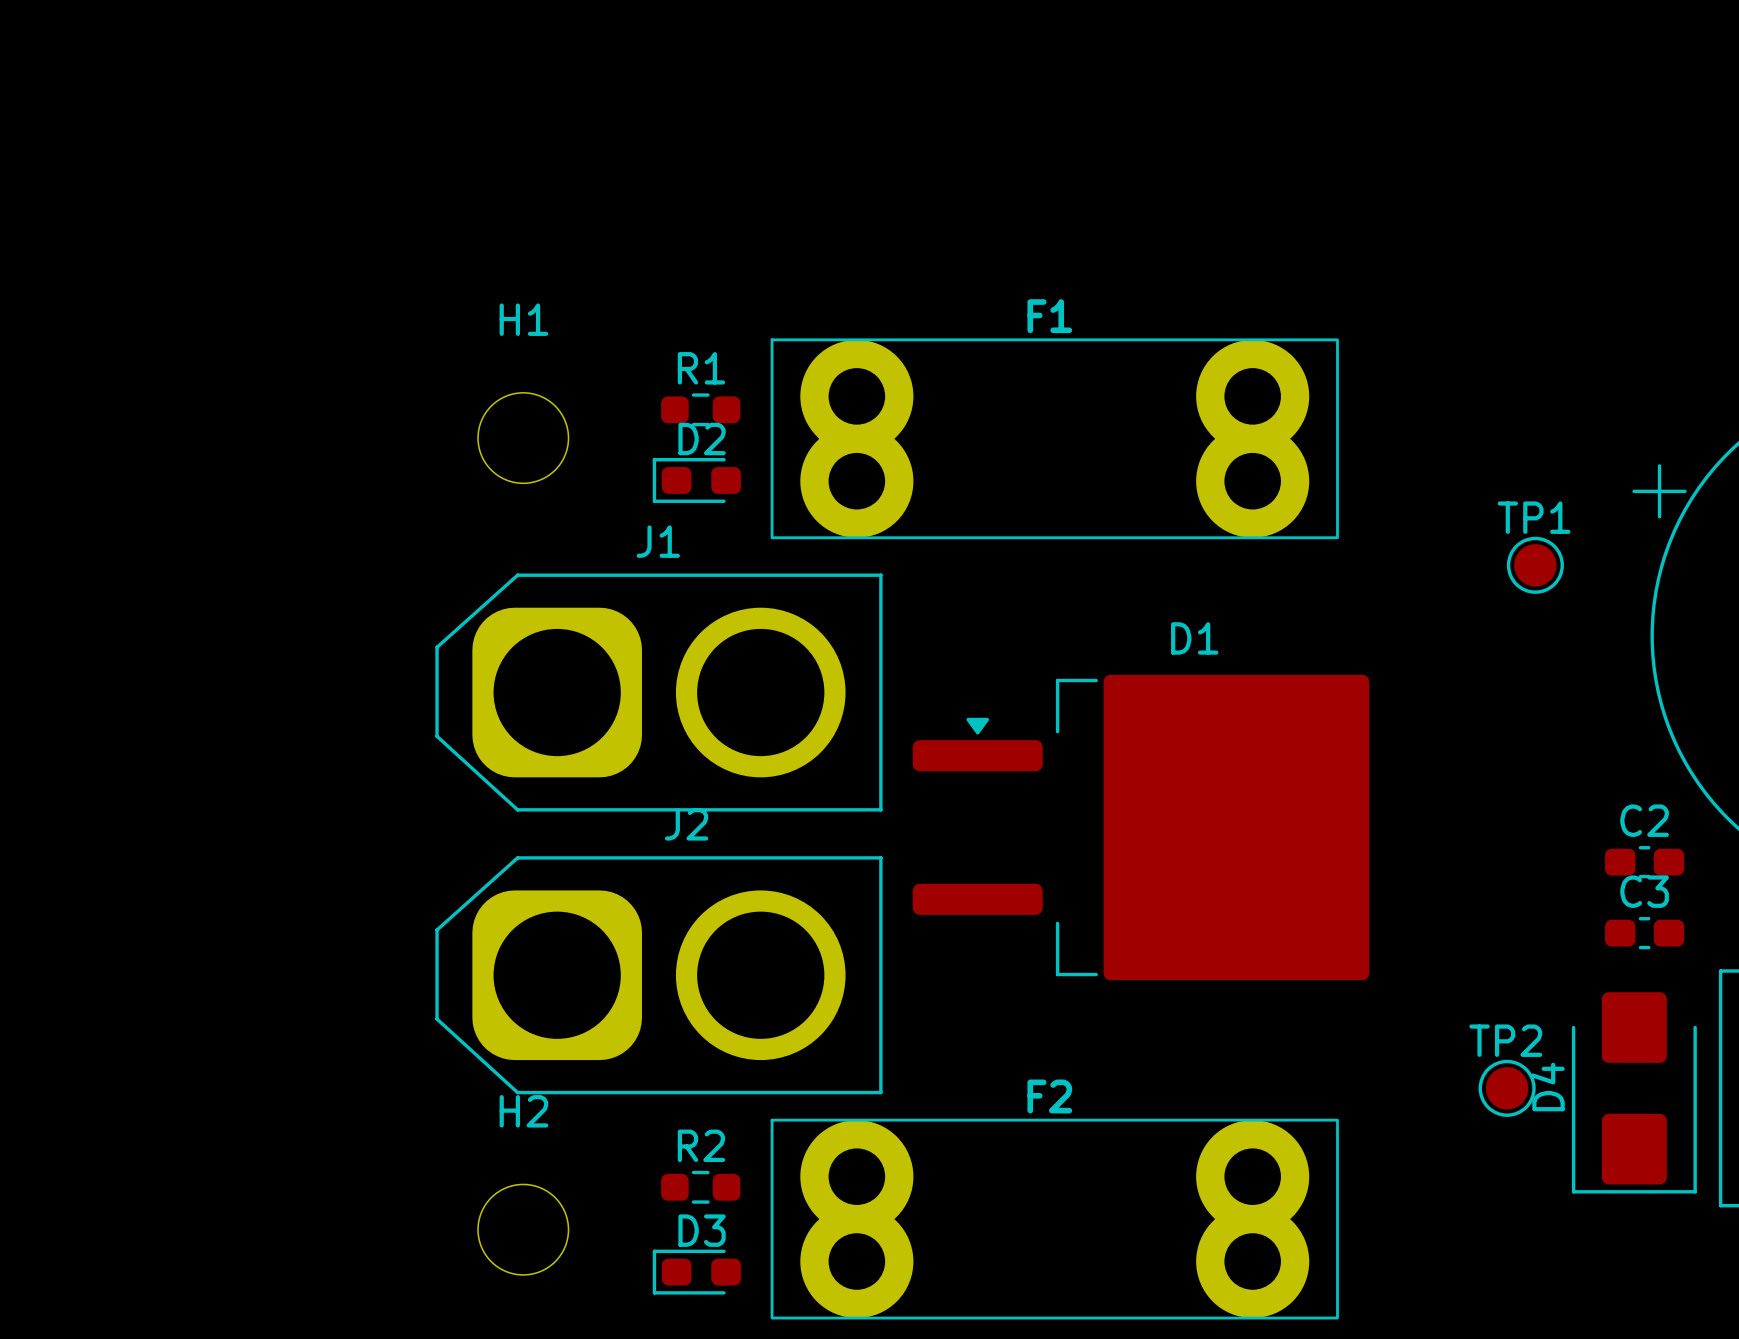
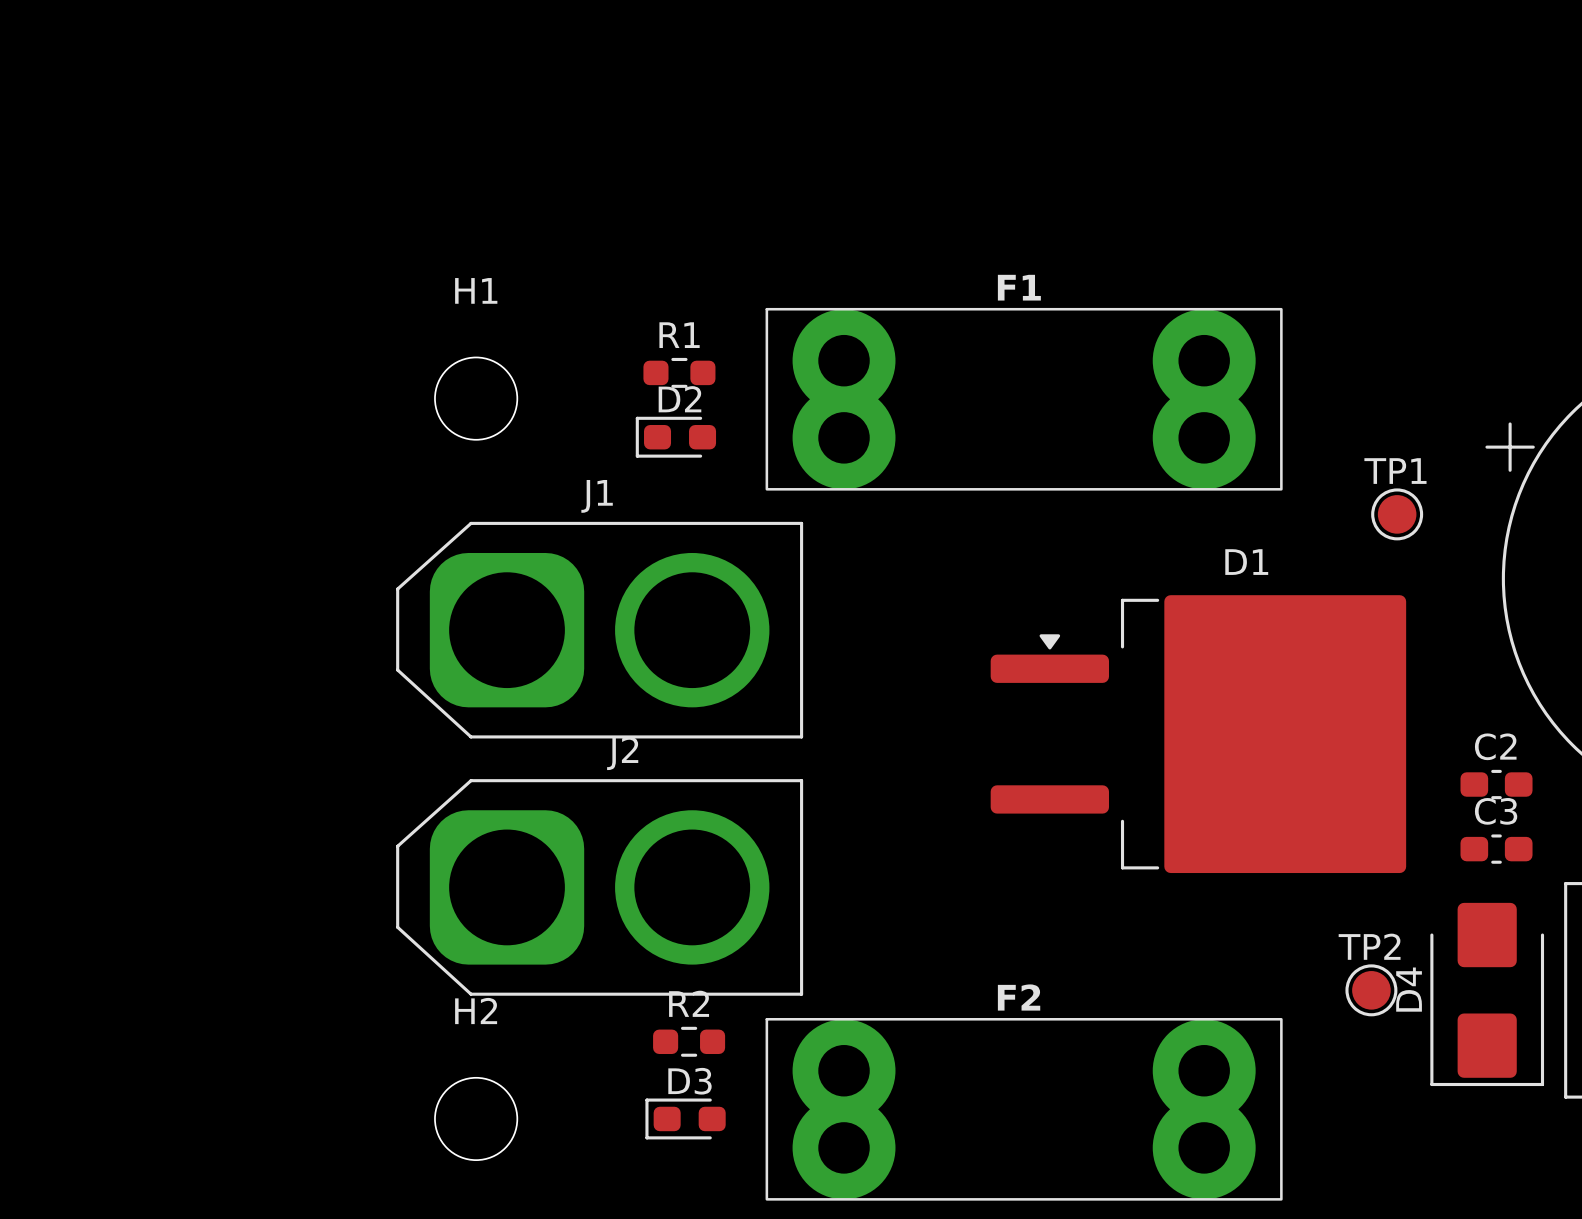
R1 position: (700, 409) -> (679, 372)
F1 position: (1054, 438) -> (1024, 399)
D2 position: (696, 480) -> (675, 437)
D1 position: (1141, 827) -> (1198, 734)
R2 position: (700, 1187) -> (689, 1041)
F2 position: (1054, 1219) -> (1024, 1109)
D3 position: (696, 1272) -> (685, 1118)

